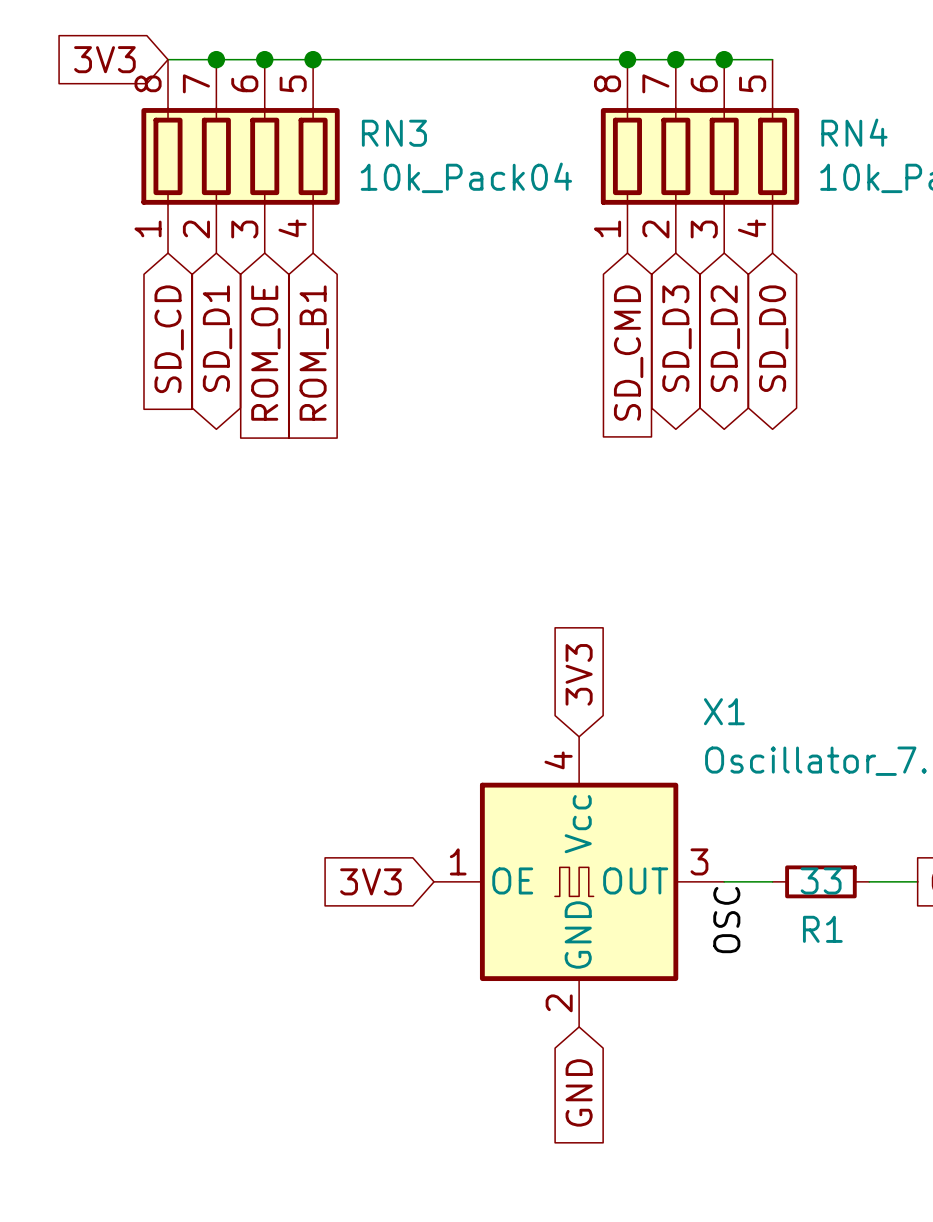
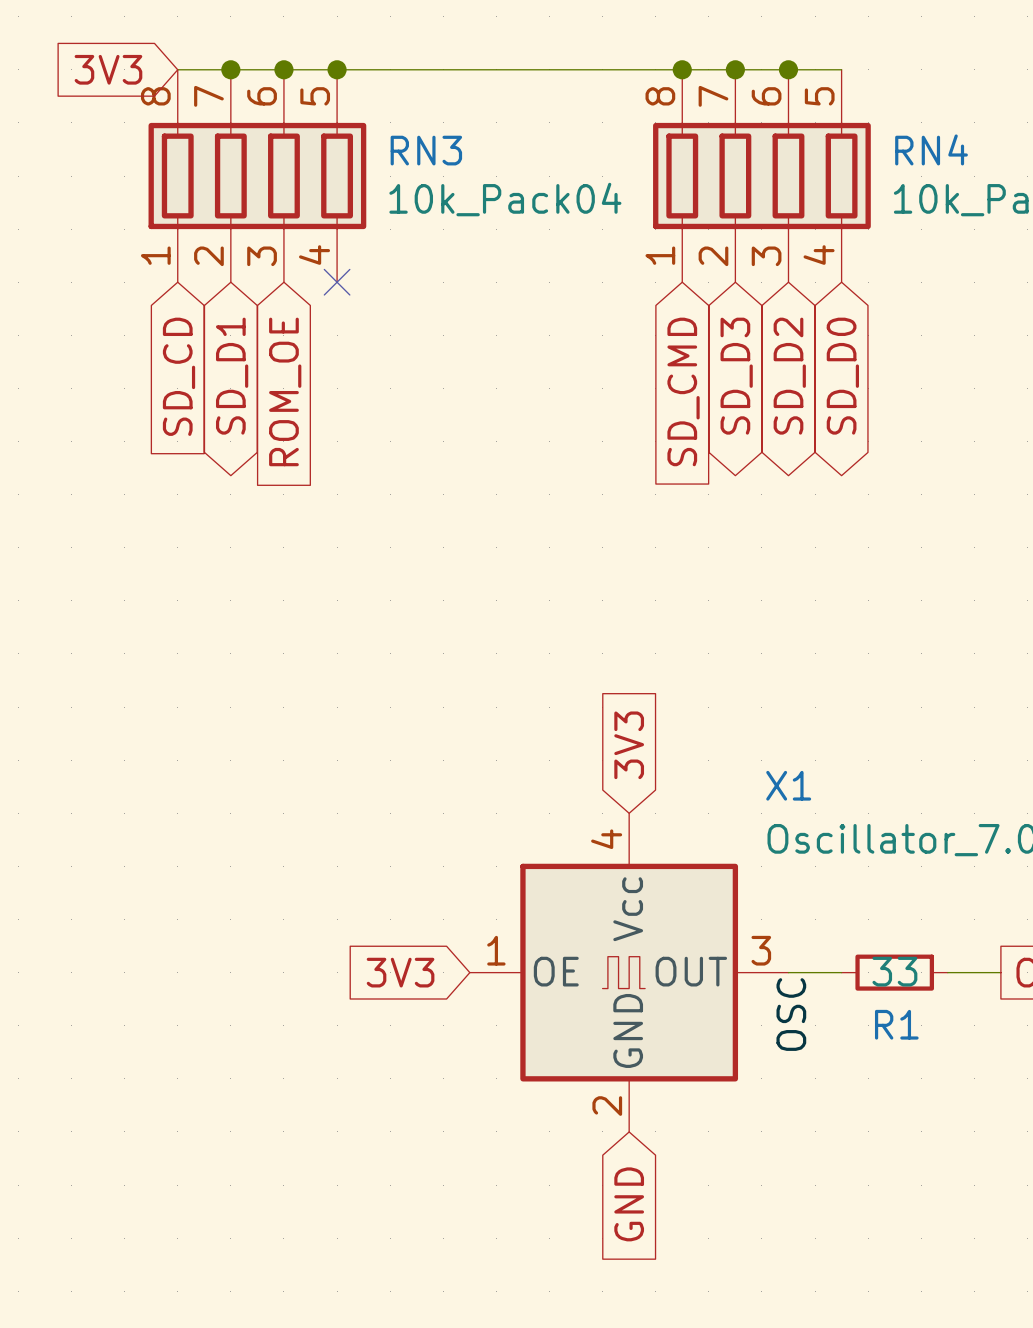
no-connect mark: none -> (337, 282)
global label: ROM_B1 (314, 353) -> none

